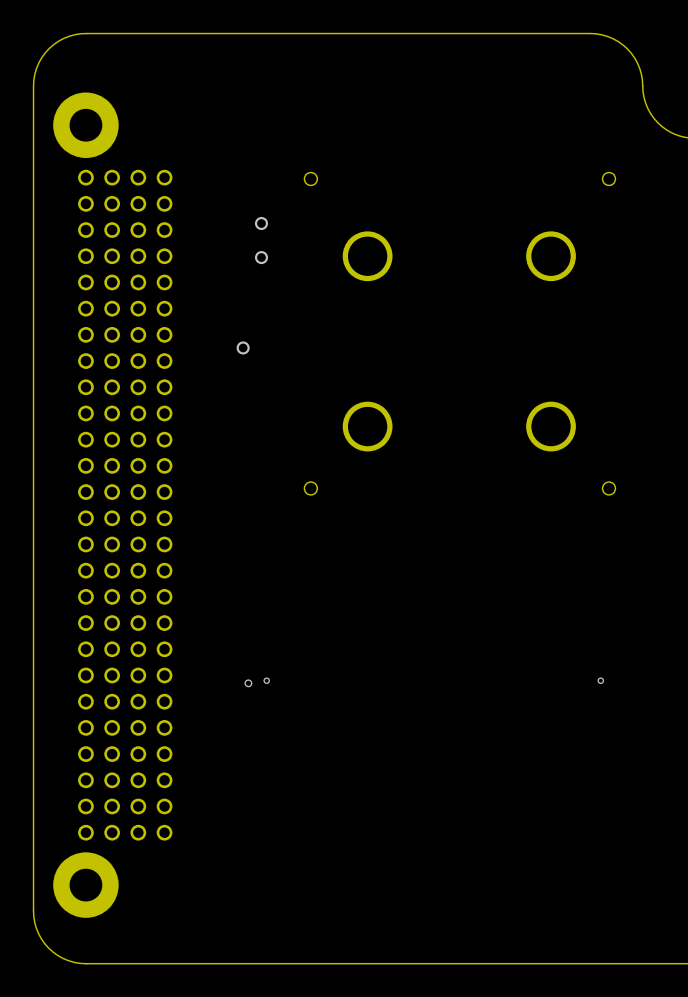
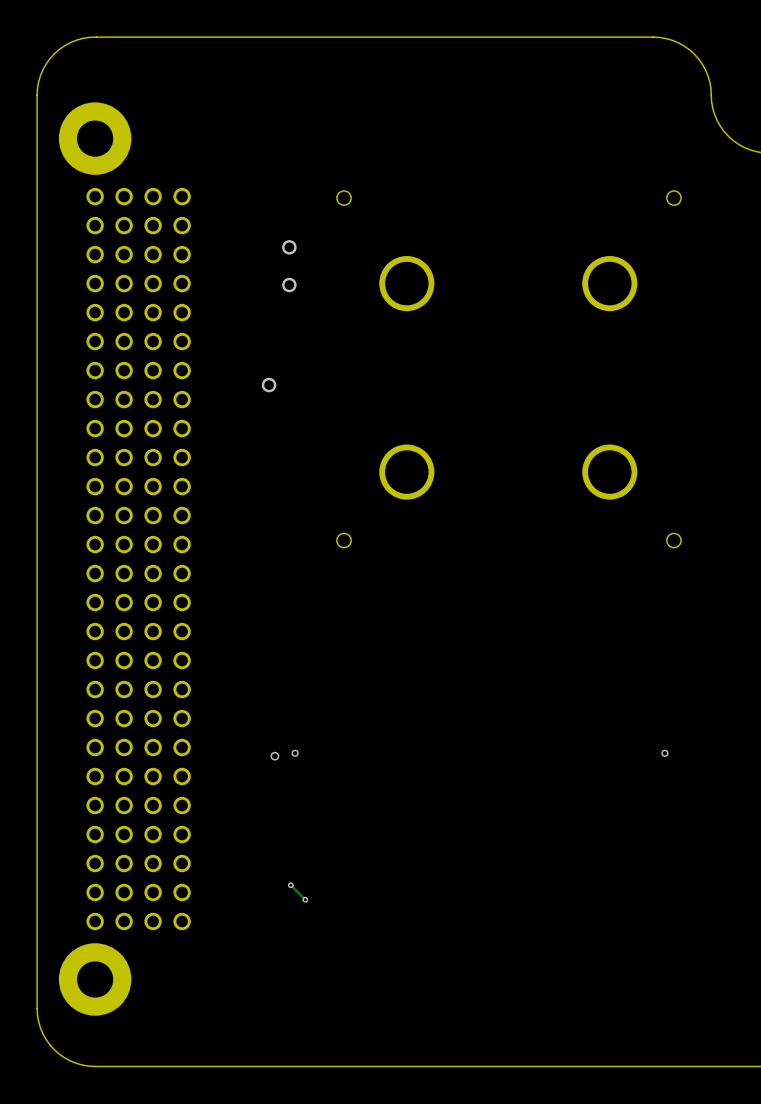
track: none -> (290, 885) (305, 899)
via: none -> (290, 885)
via: none -> (305, 899)

